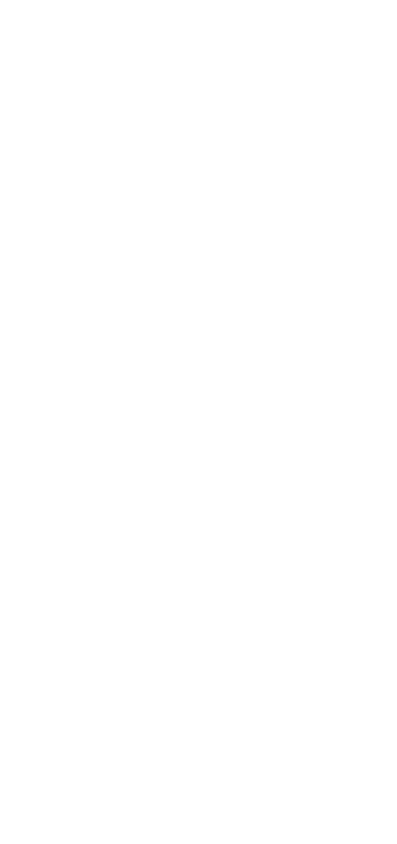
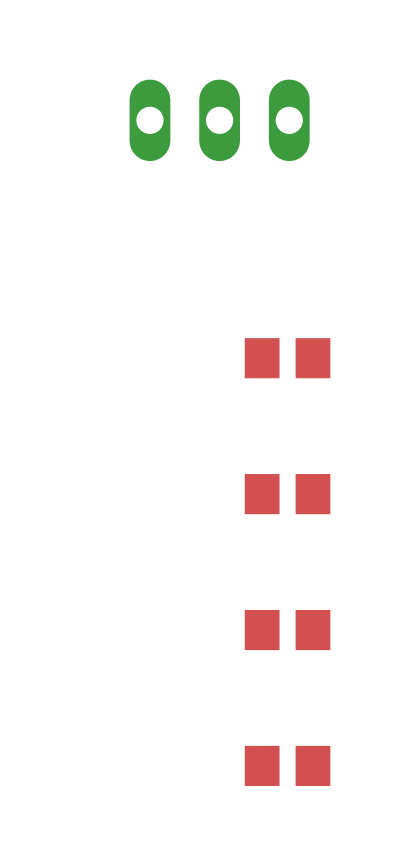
part: none -> (219, 120)
part: none -> (287, 358)
part: none -> (287, 494)
part: none -> (287, 630)
part: none -> (287, 765)

